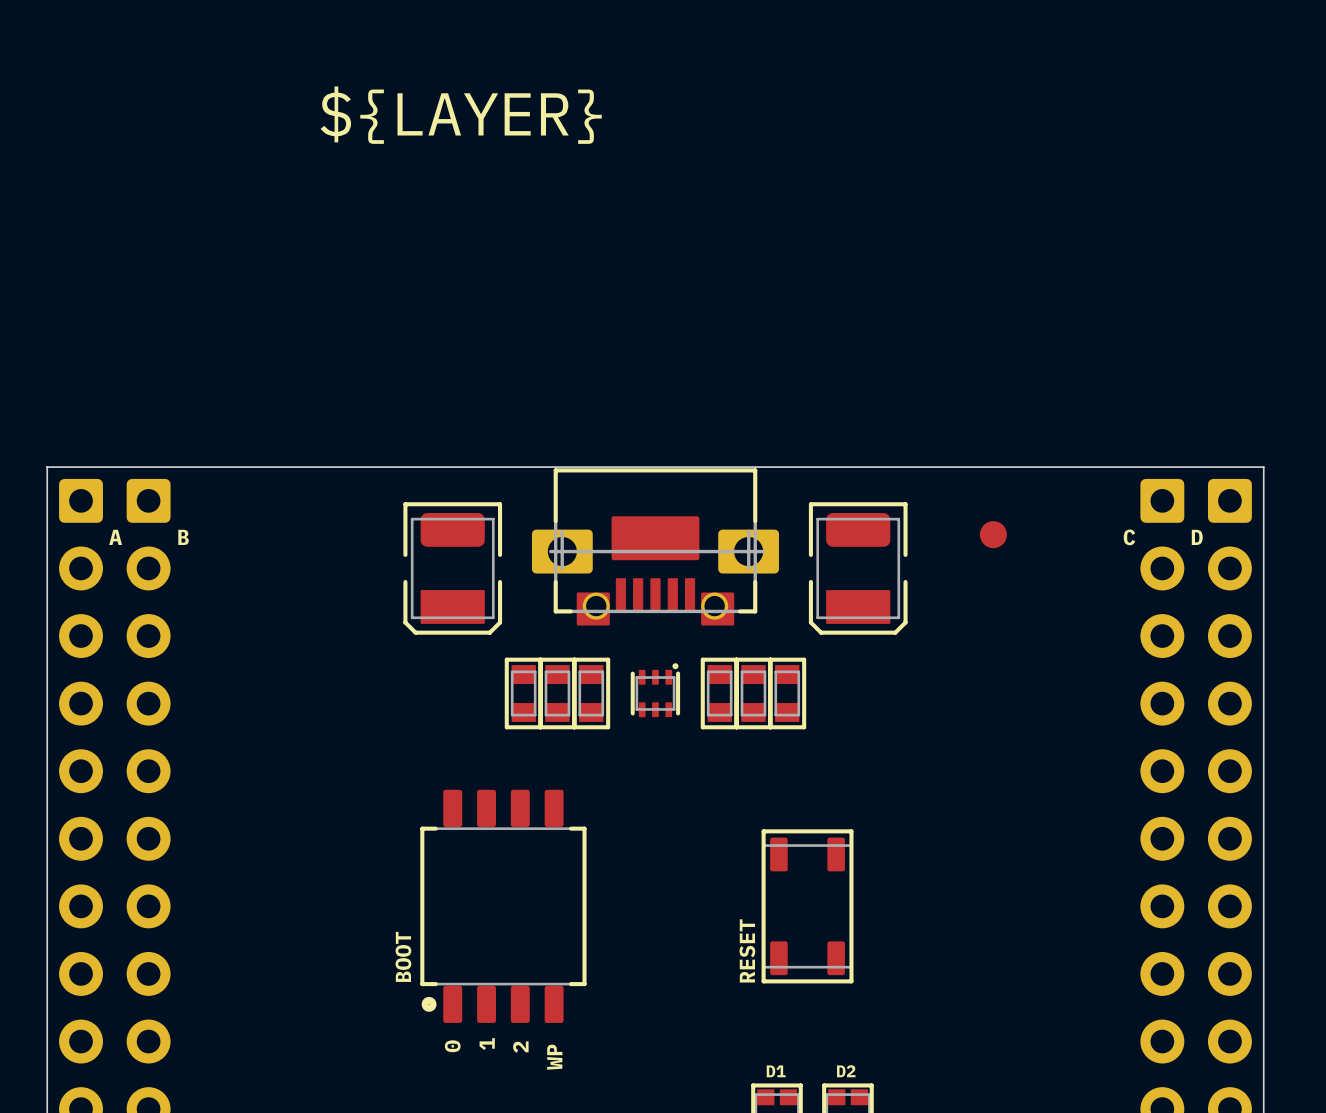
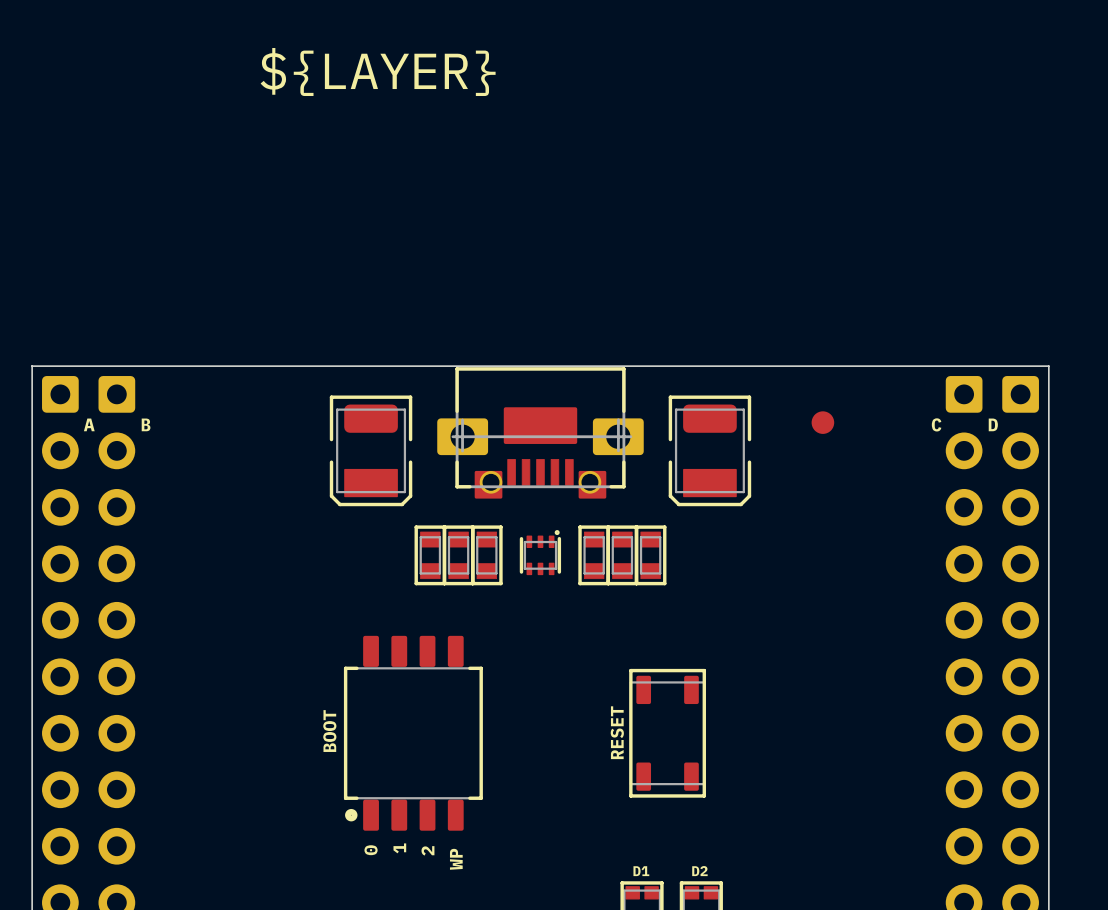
text position: RESET (747, 950) -> RESET (617, 732)
text position: BOOT (403, 956) -> BOOT (329, 731)

